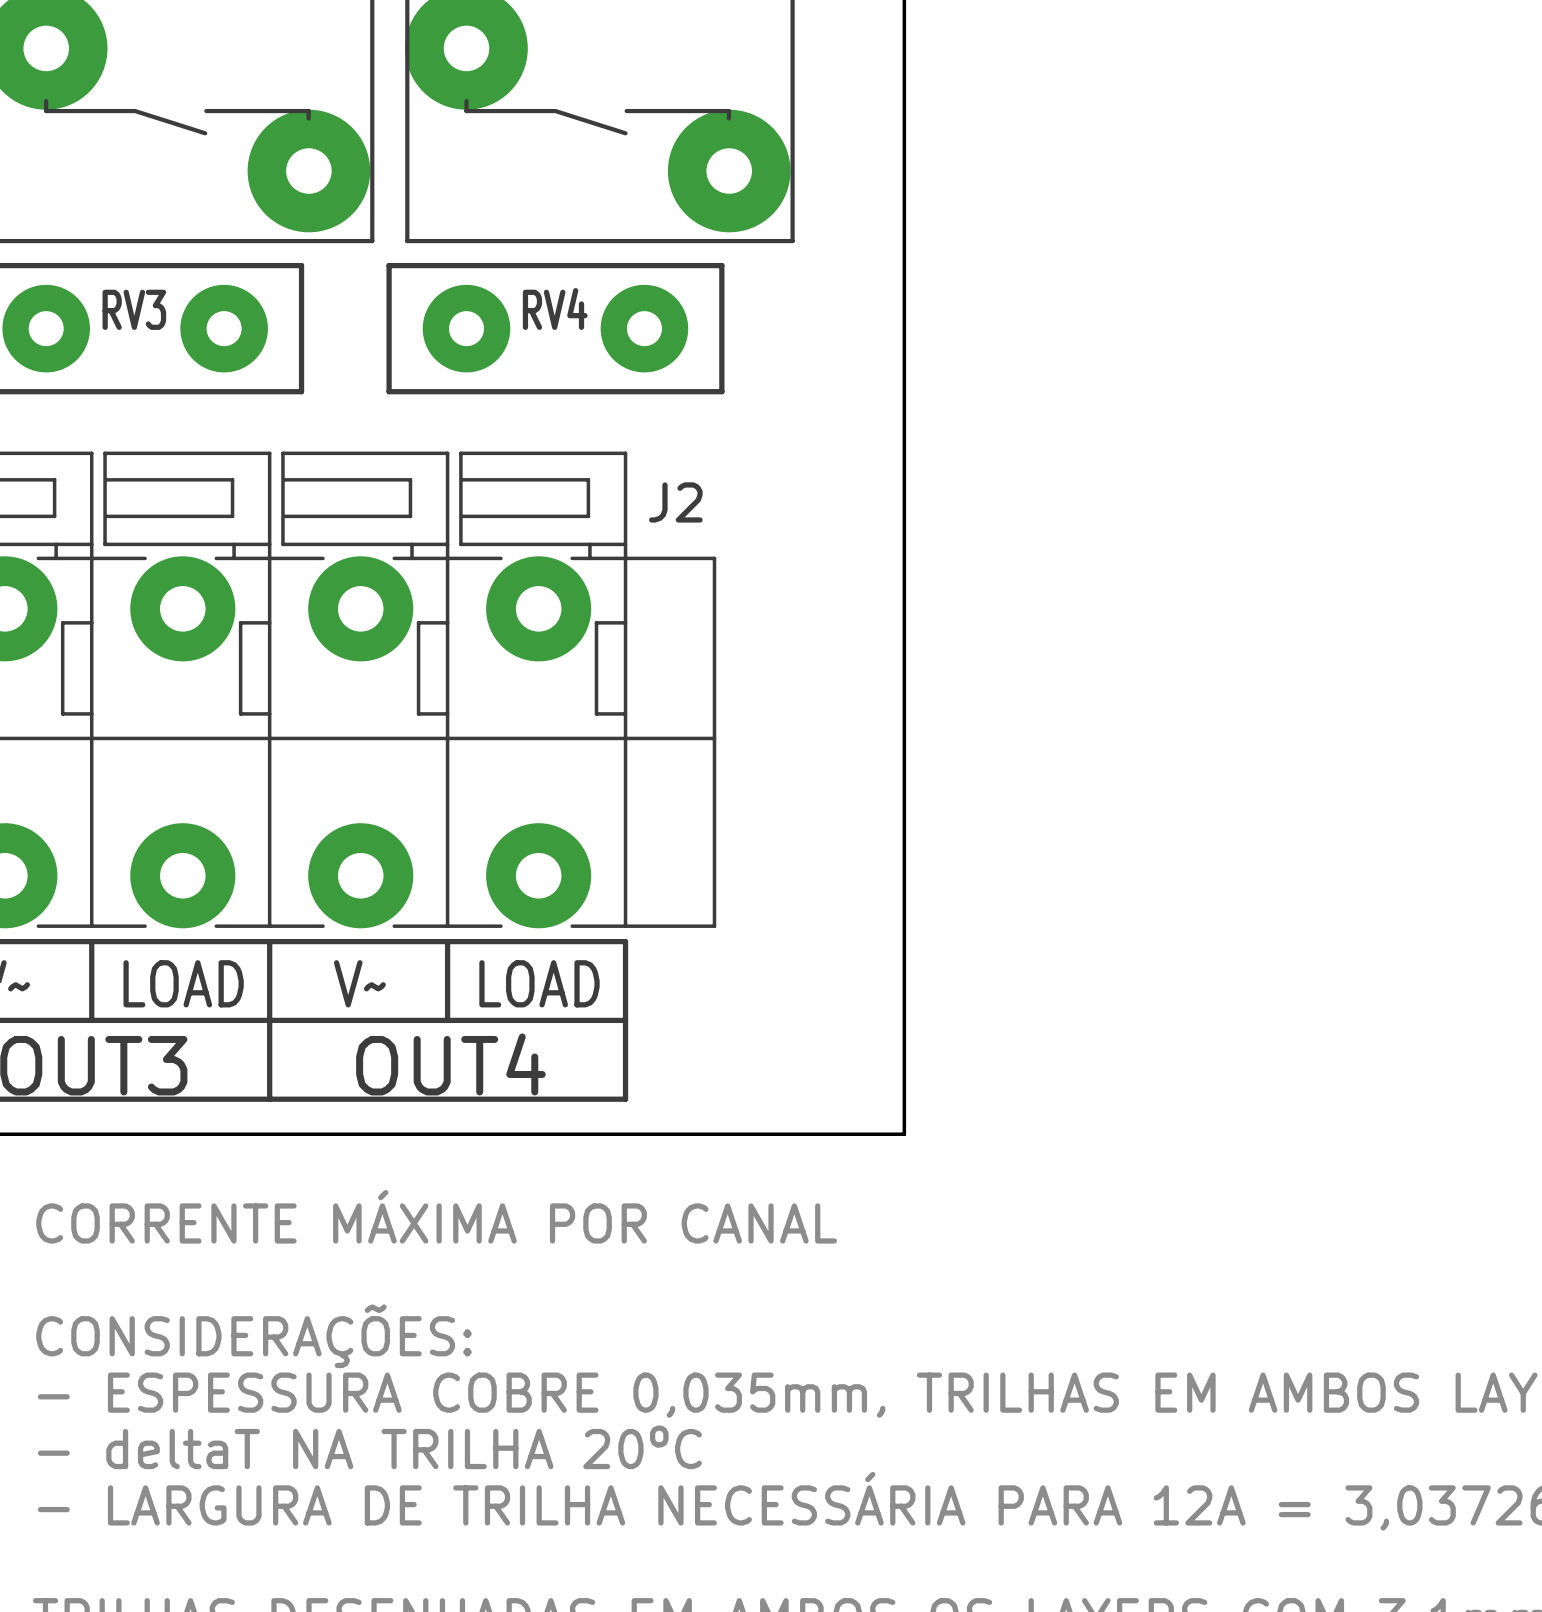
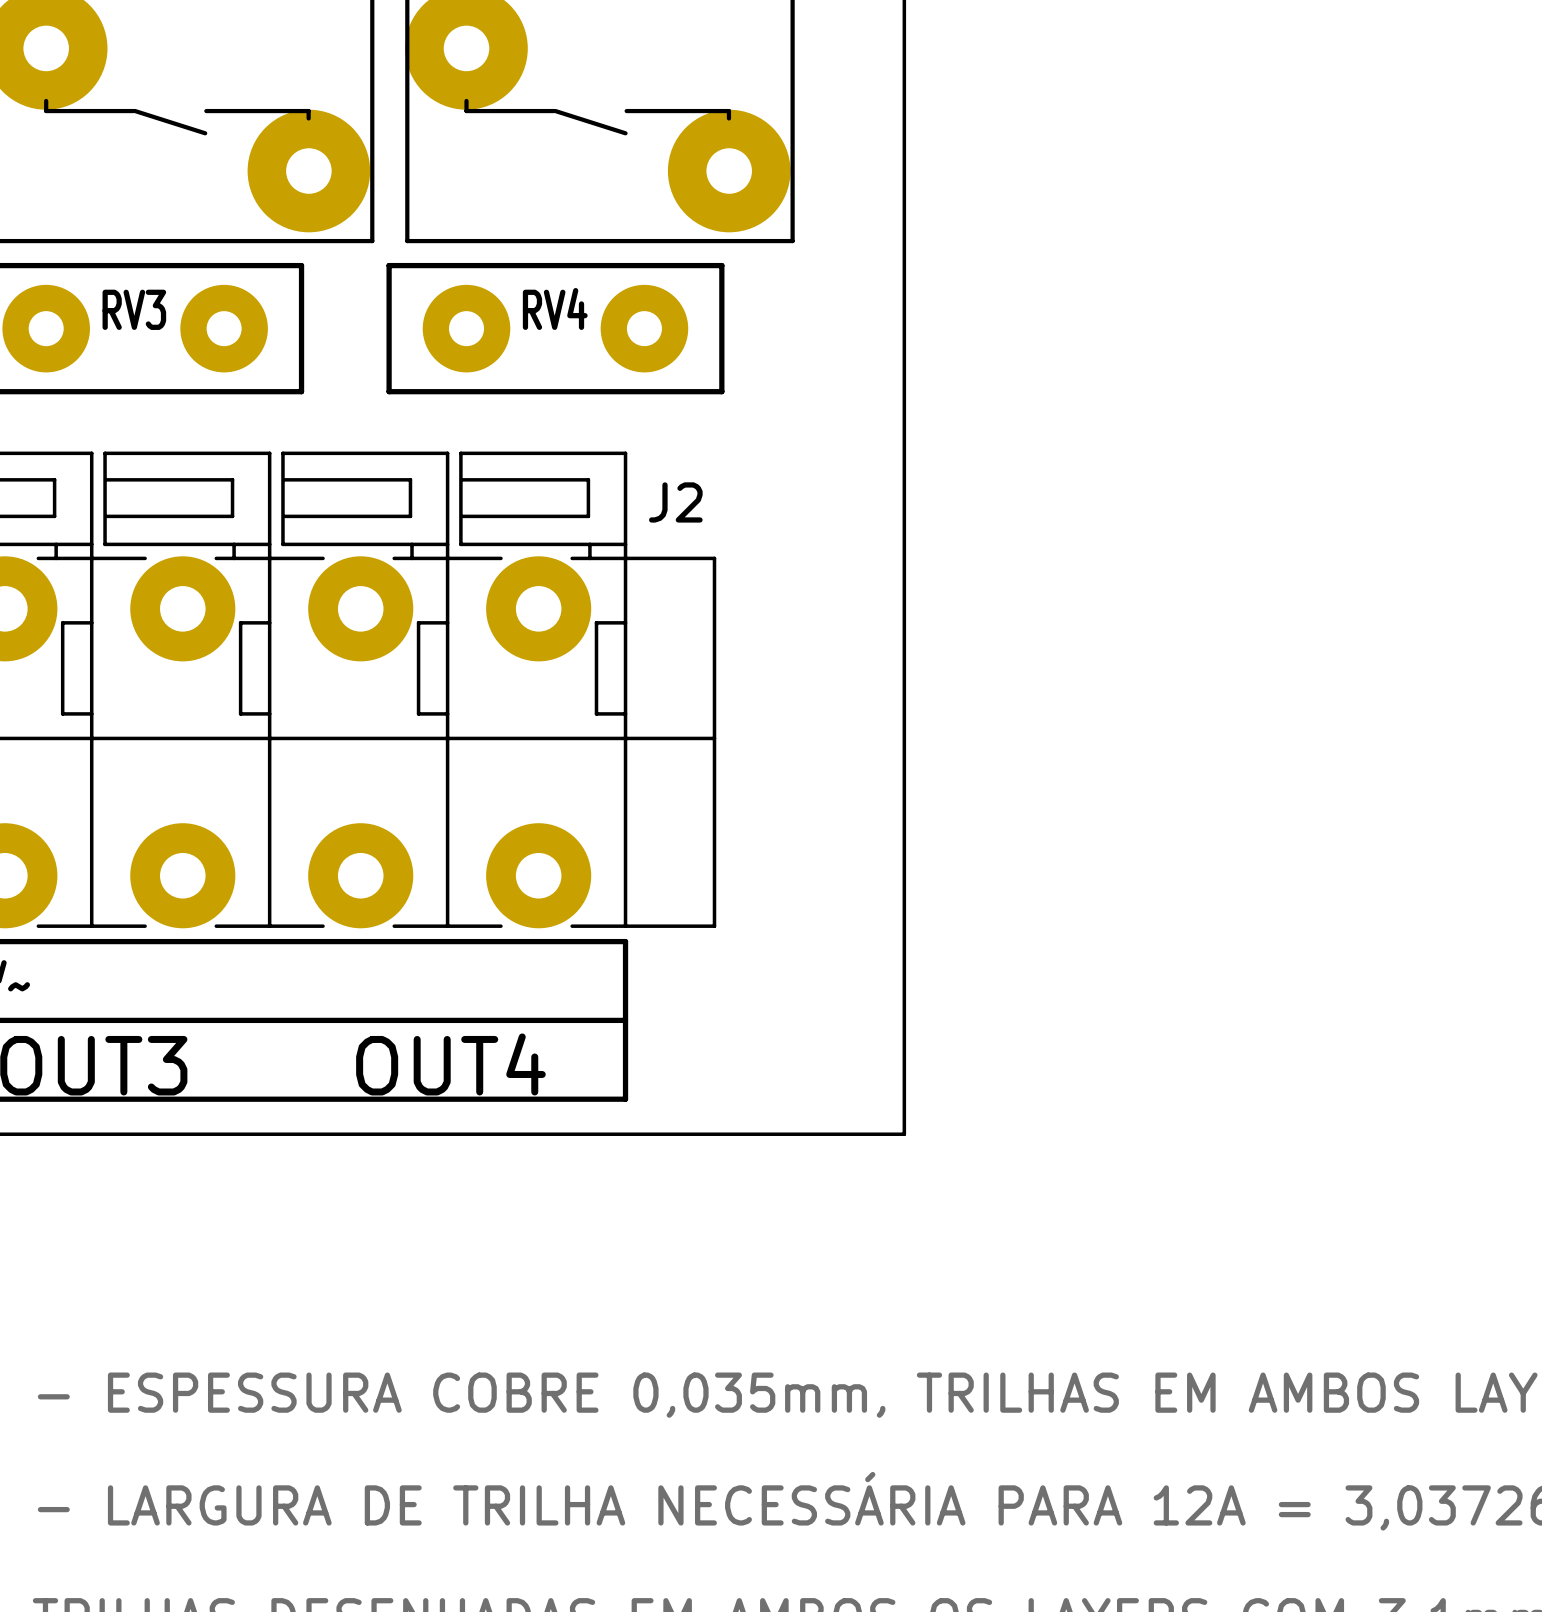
line: (91, 941) (91, 1020) -> none
line: (269, 941) (269, 1099) -> none
line: (447, 941) (447, 1020) -> none
text: LOAD (183, 983) -> none
text: V~ (359, 983) -> none
text: LOAD (539, 983) -> none
text: CORRENTE MÁXIMA POR CANAL (436, 1216) -> none
text: CONSIDERAÇÕES: (253, 1336) -> none
text: - deltaT NA TRILHA 20ºC (369, 1447) -> none

